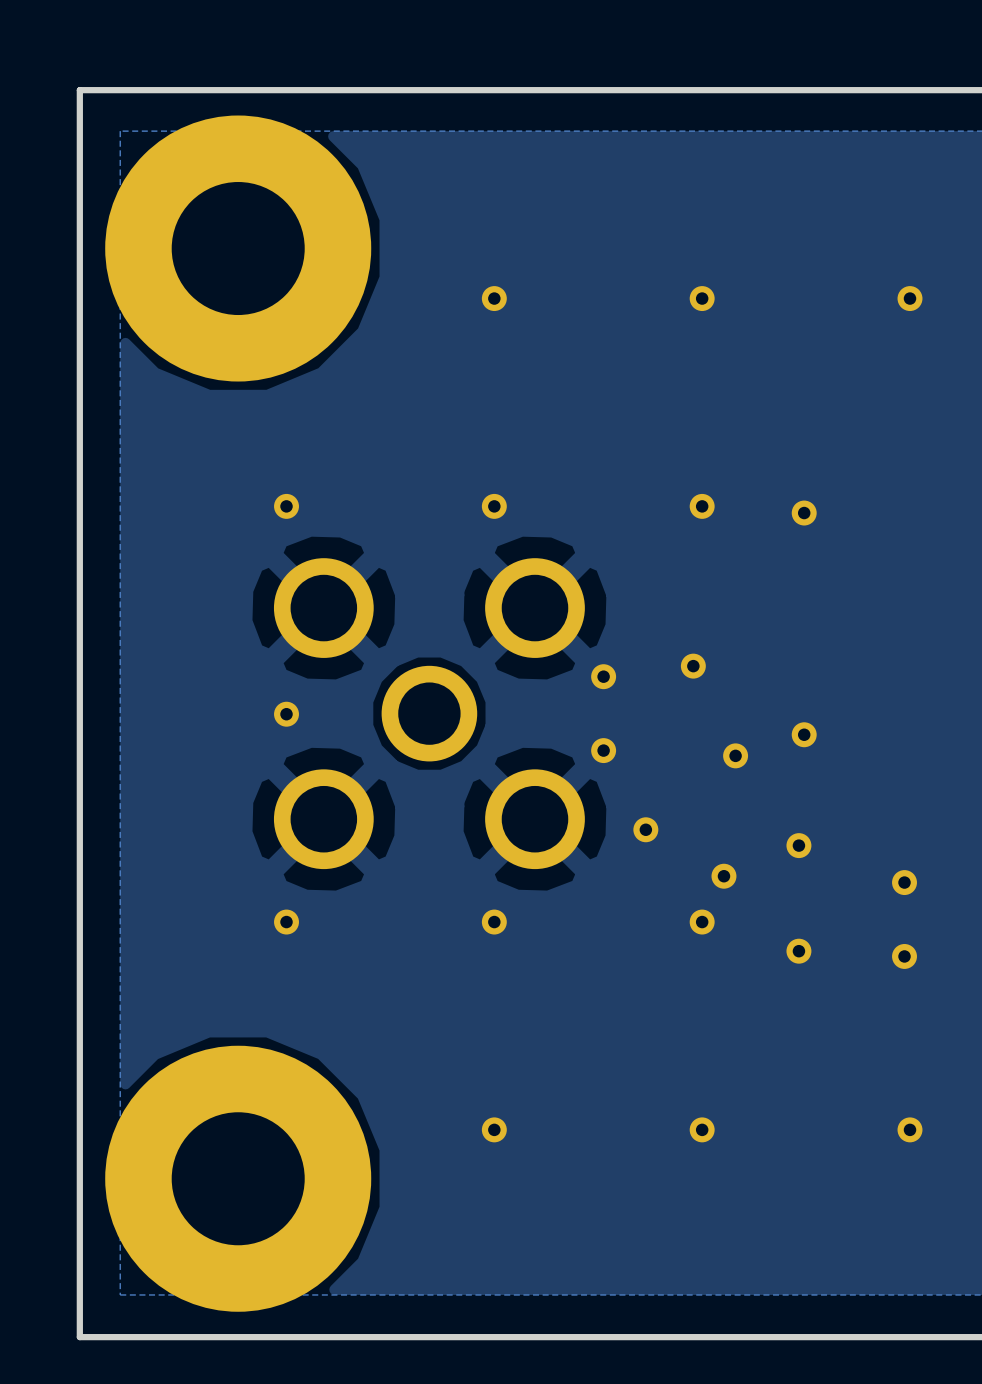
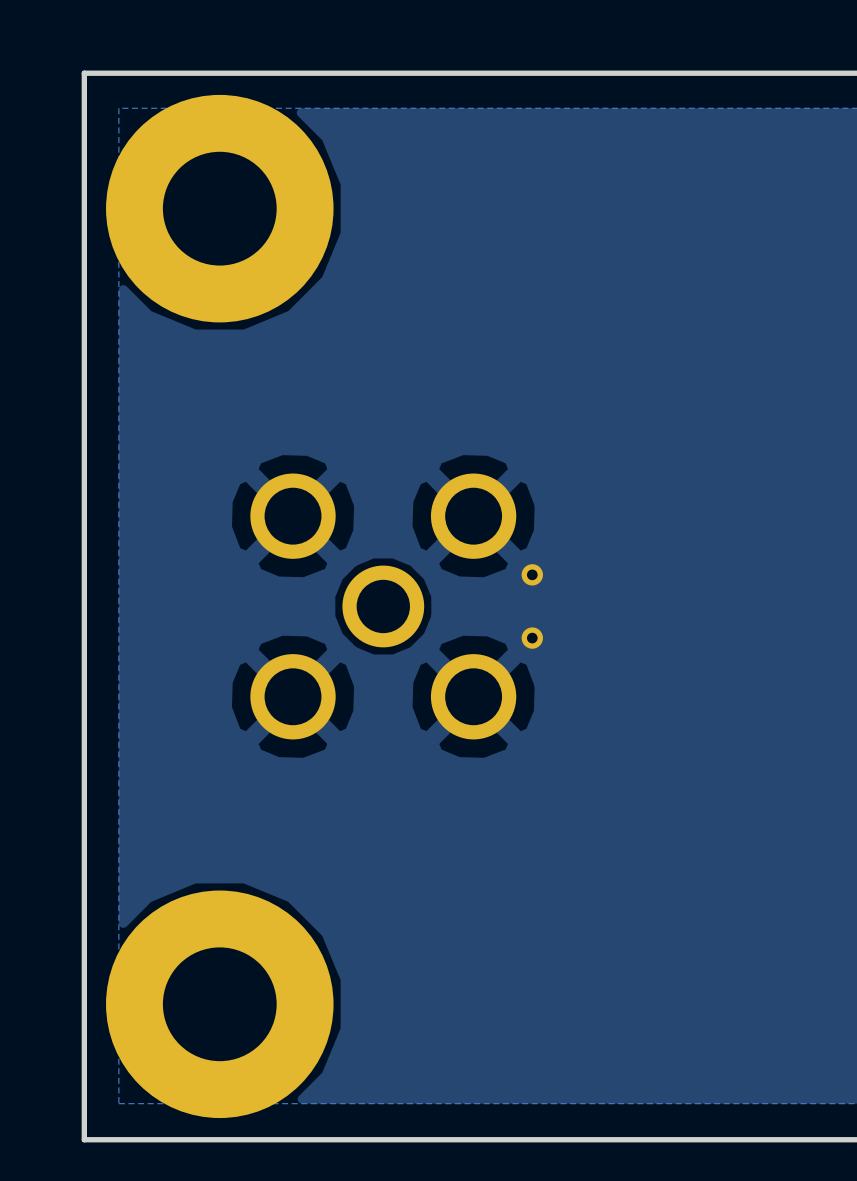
part: (494, 298) -> none
part: (702, 298) -> none
part: (910, 298) -> none
part: (286, 506) -> none
part: (494, 506) -> none
part: (702, 506) -> none
part: (804, 513) -> none
part: (693, 666) -> none
part: (286, 714) -> none
part: (804, 734) -> none
part: (735, 755) -> none
part: (645, 829) -> none
part: (798, 845) -> none
part: (723, 876) -> none
part: (904, 882) -> none
part: (286, 922) -> none
part: (494, 922) -> none
part: (702, 922) -> none
part: (798, 951) -> none
part: (904, 956) -> none
part: (494, 1129) -> none
part: (702, 1129) -> none
part: (910, 1129) -> none

